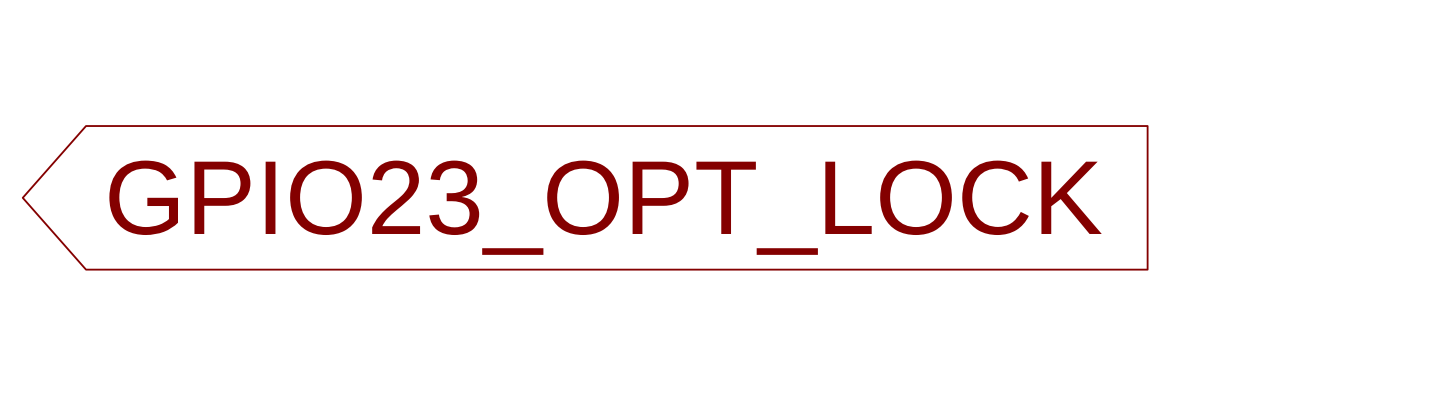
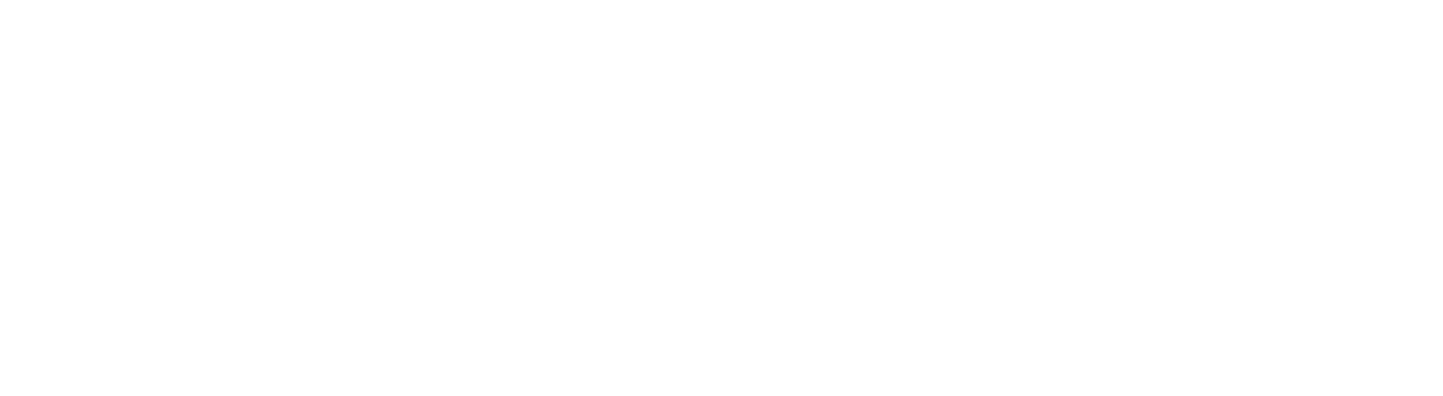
global label: GPIO23_OPT_LOCK (605, 207) -> none

